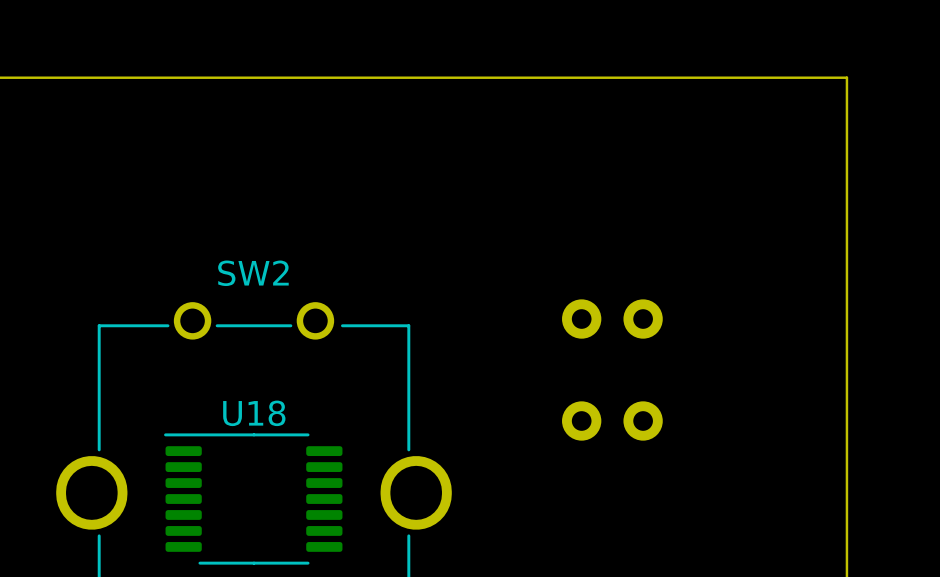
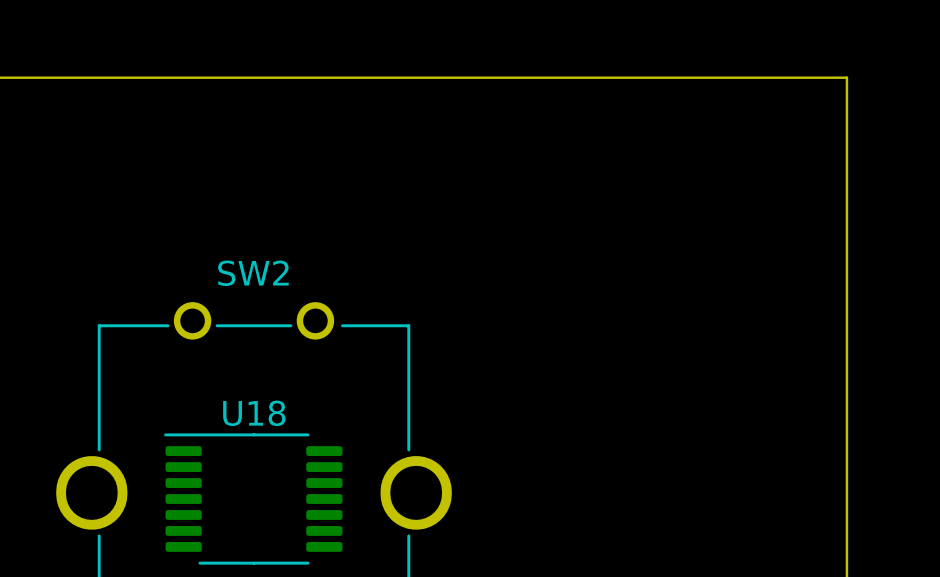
part: (612, 319) -> none
part: (612, 420) -> none

